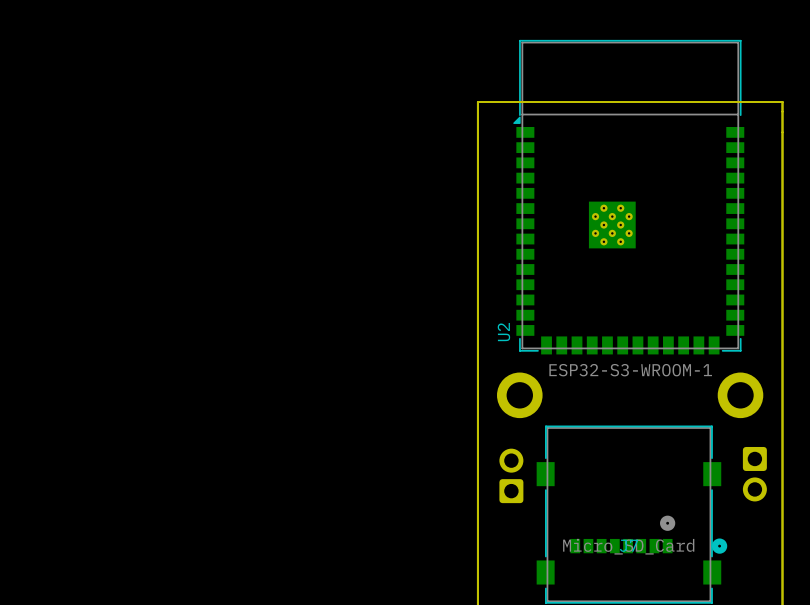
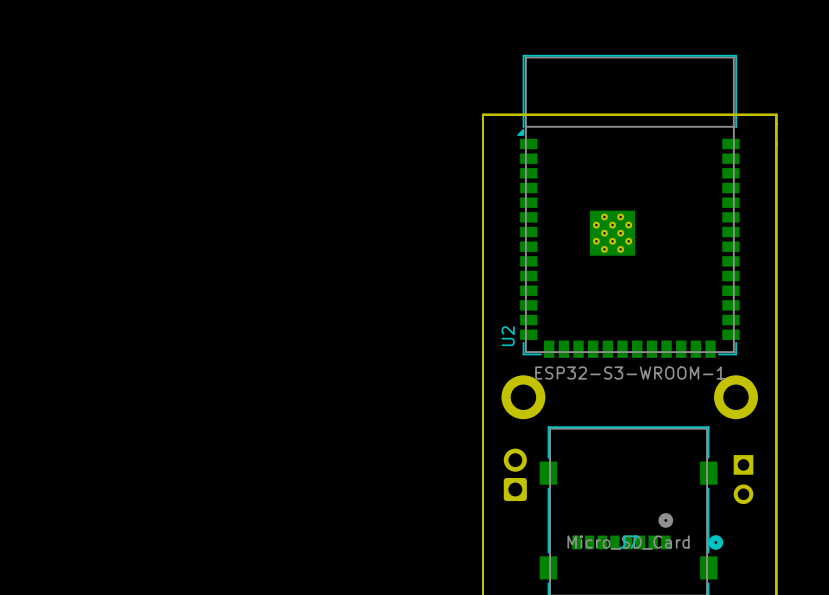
part footprint: [742, 446, 767, 502] -> [733, 455, 754, 505]

